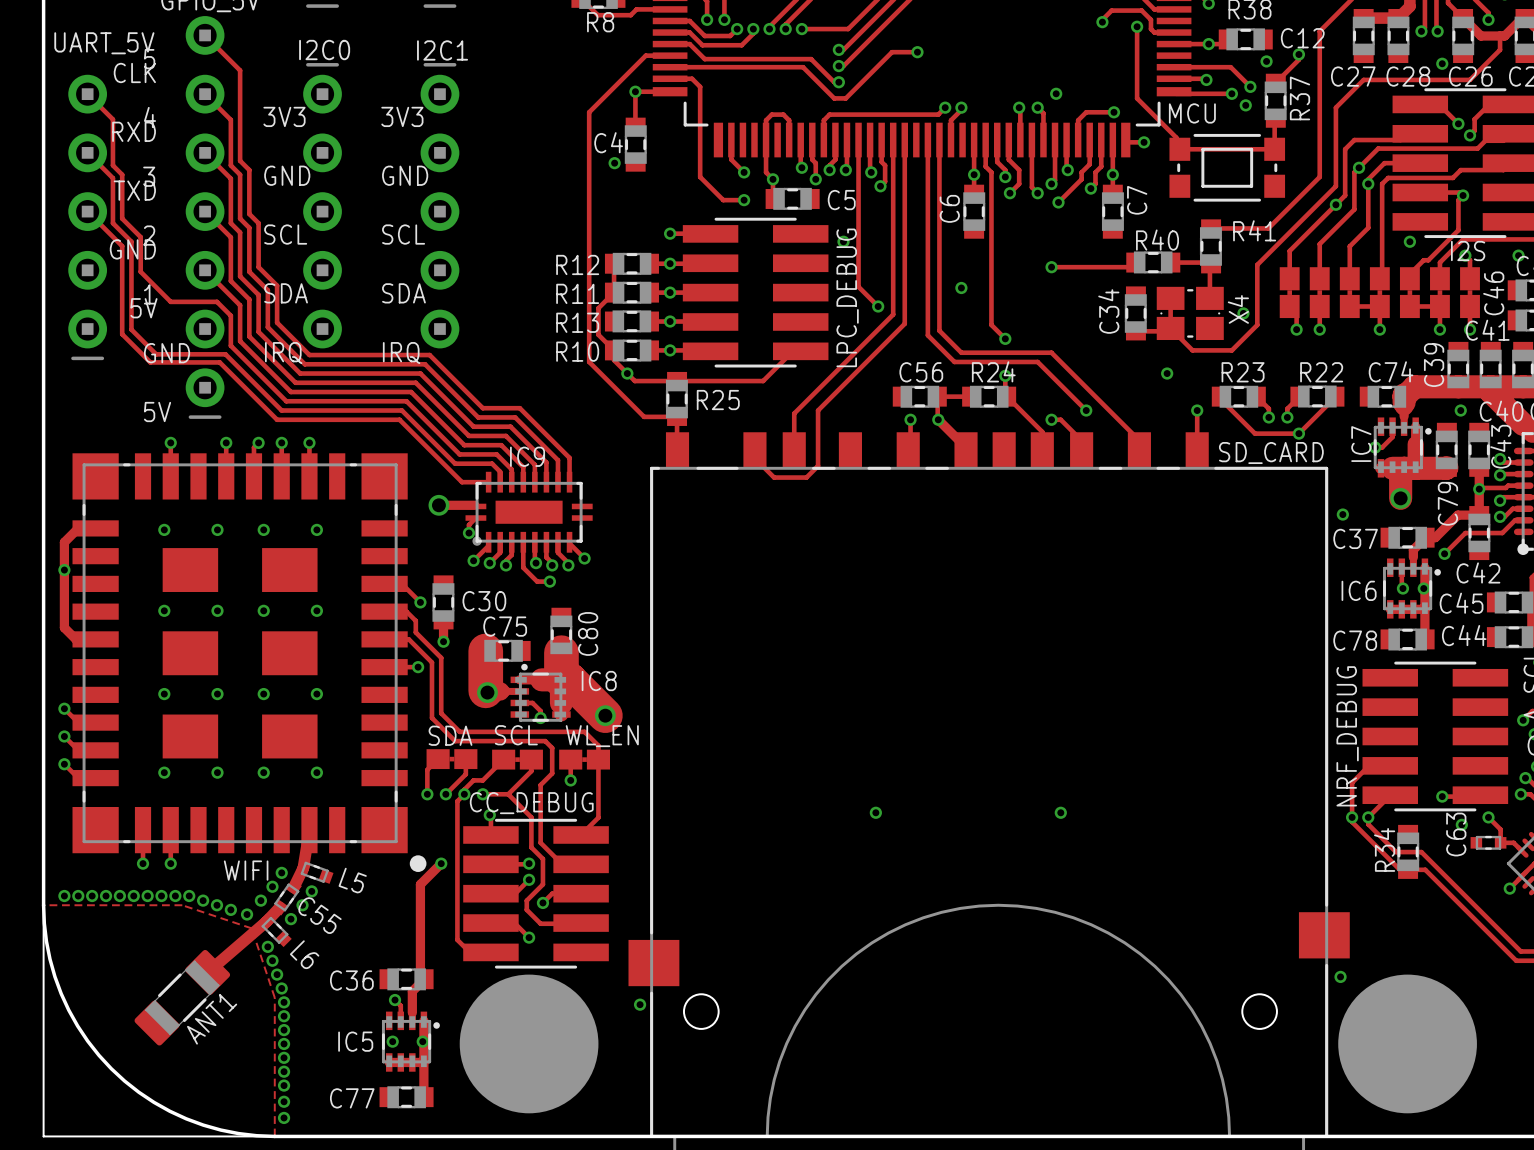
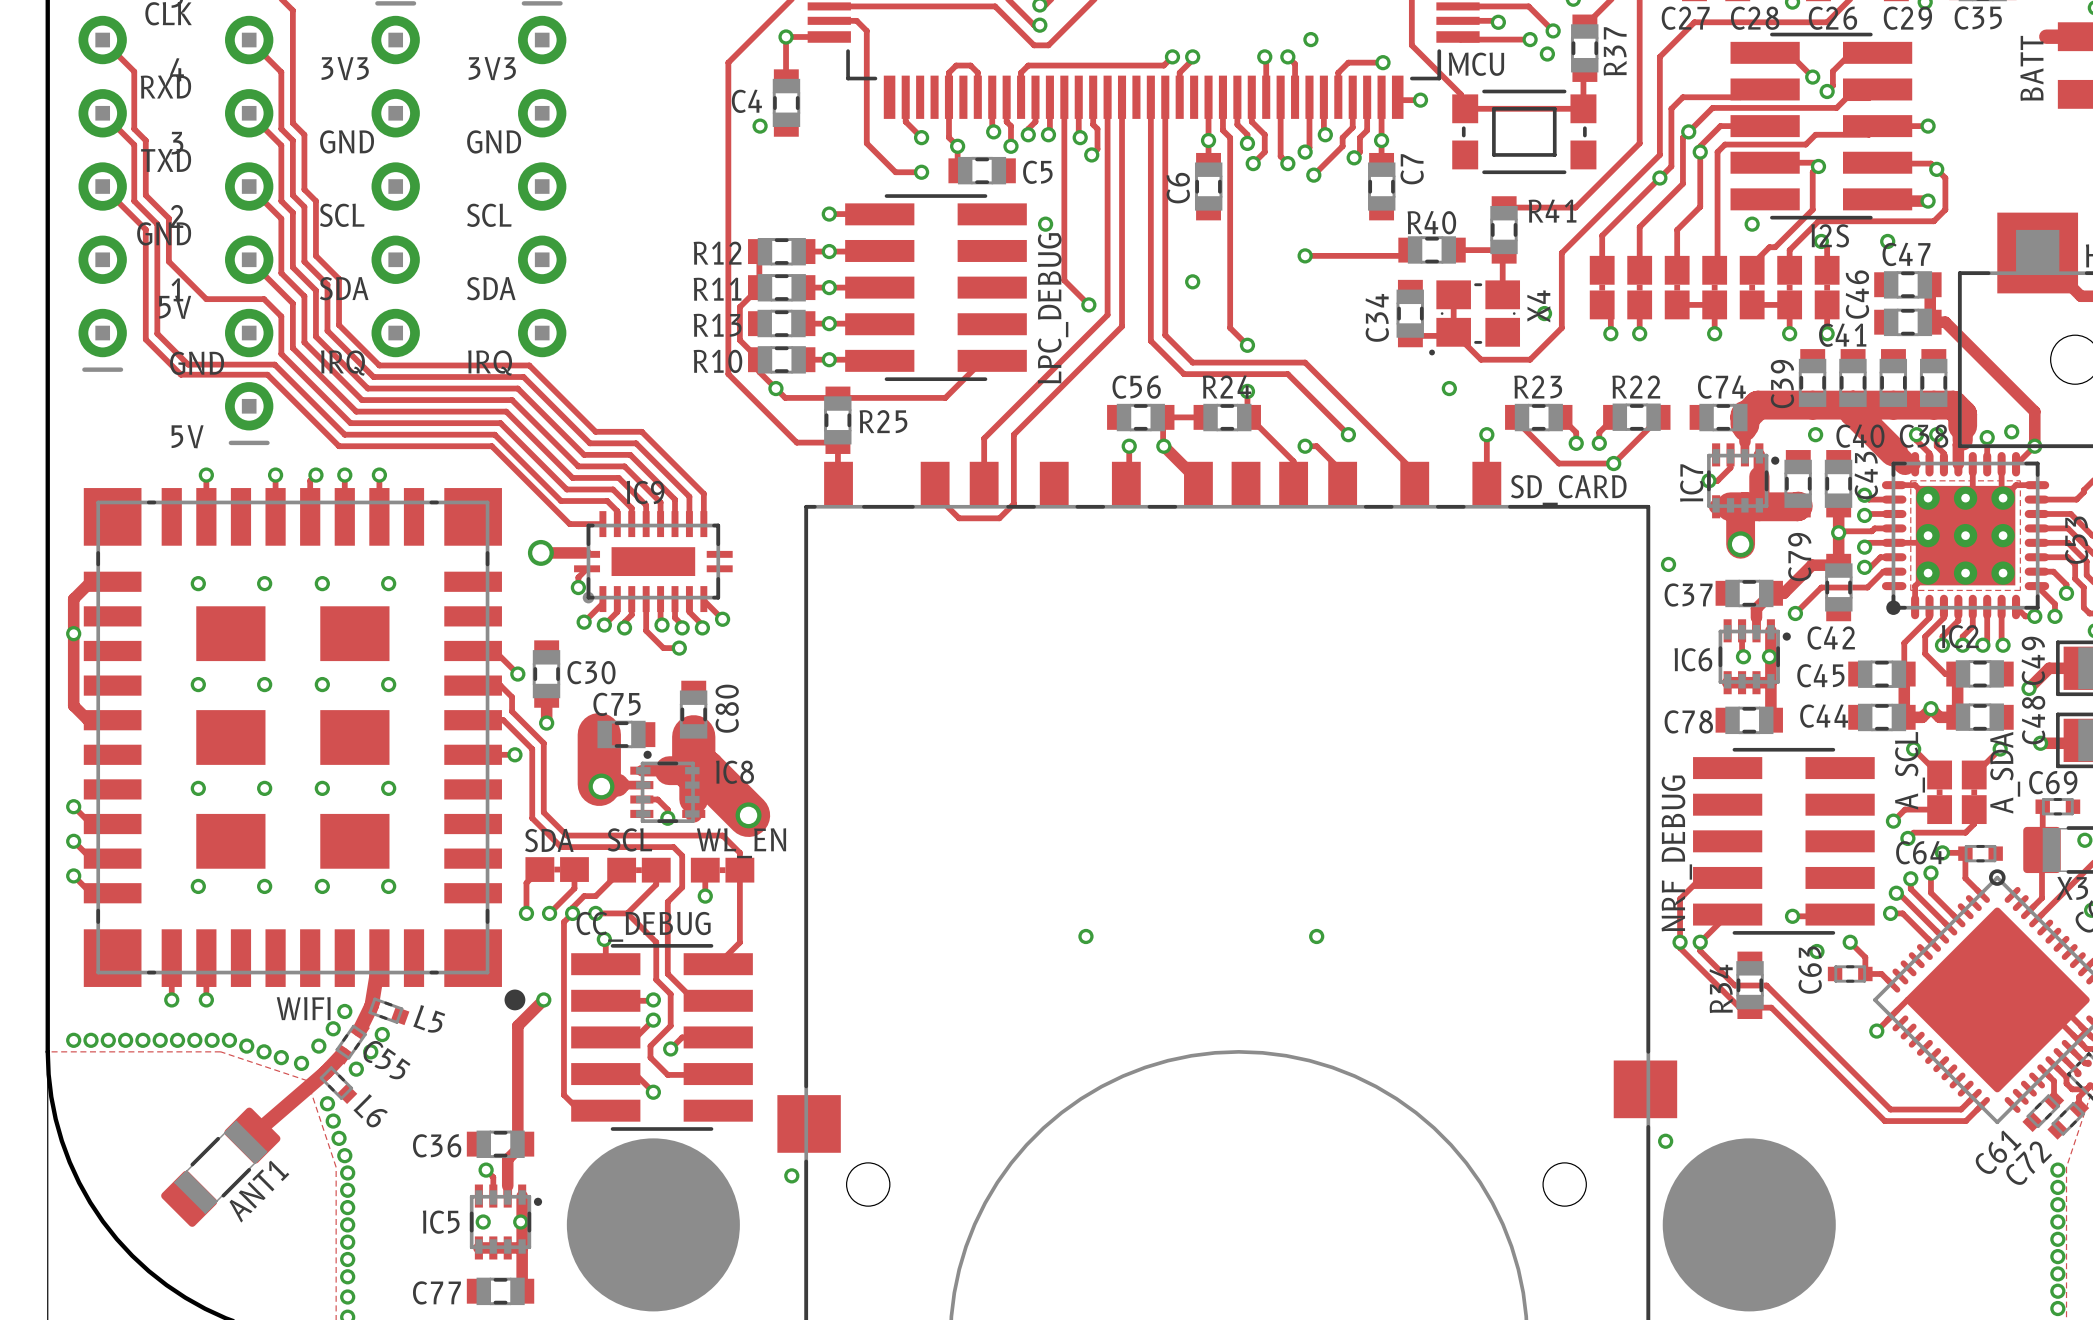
X4 footprint: [1156, 286, 1224, 341] -> [1429, 280, 1521, 356]

